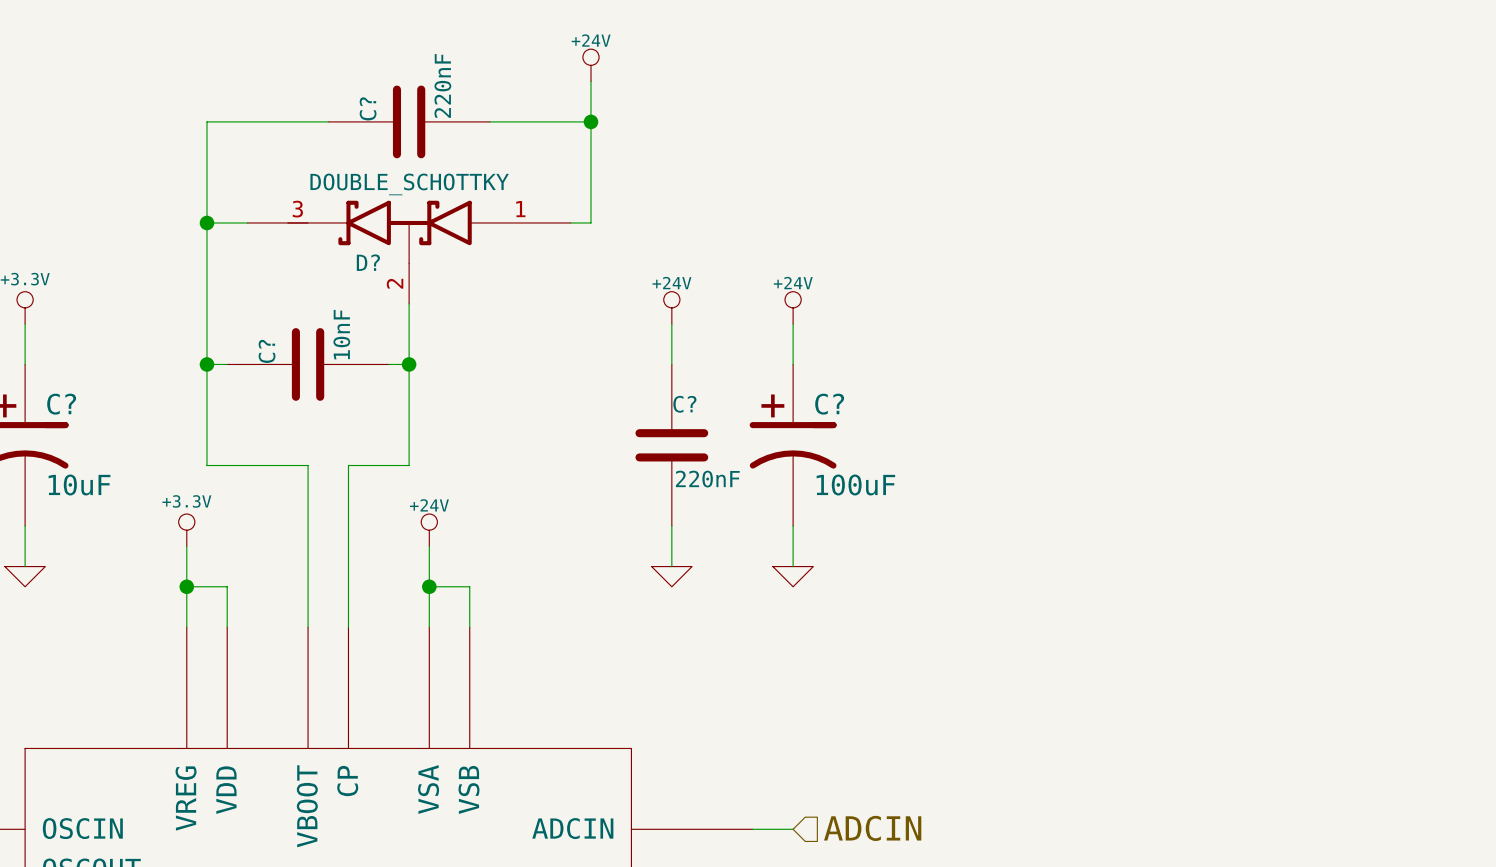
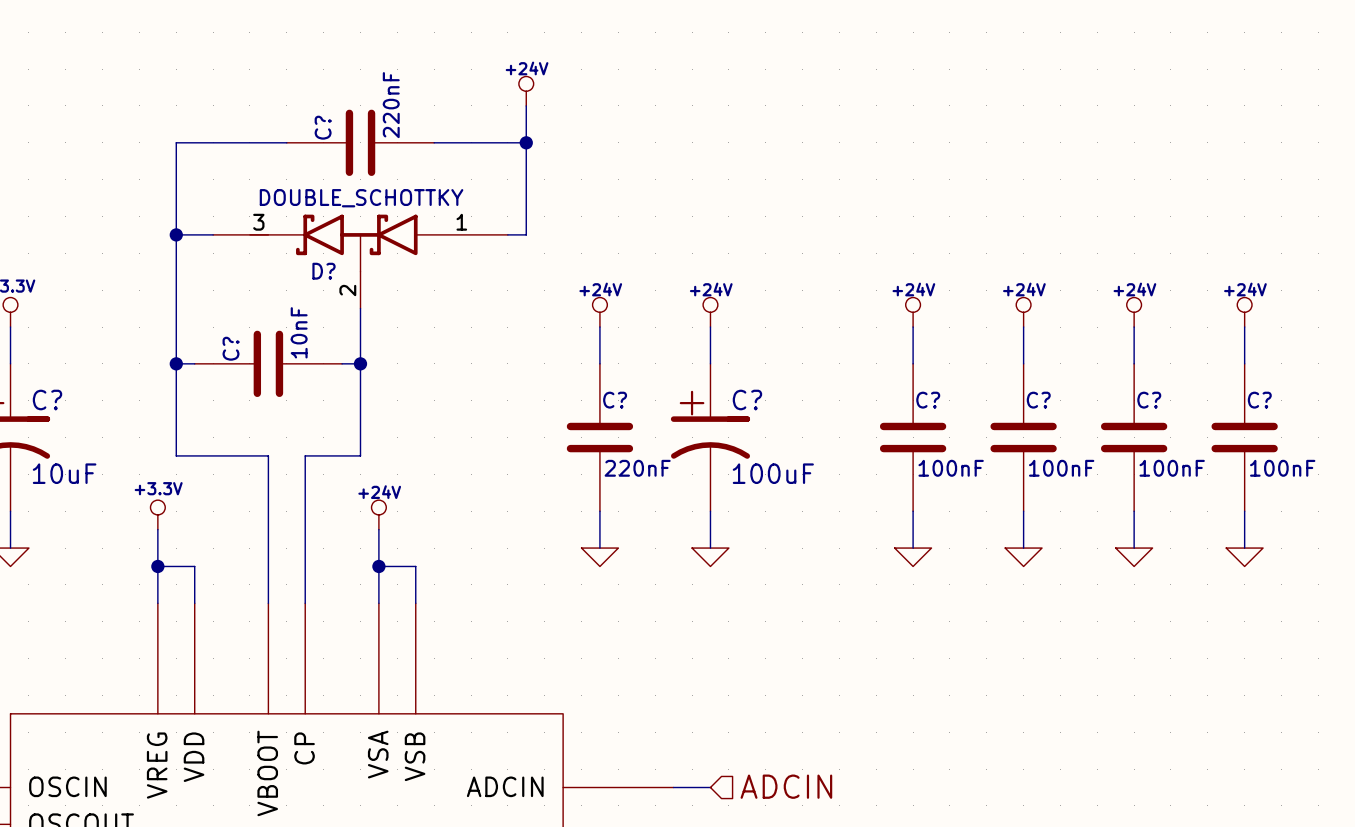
power symbol: none -> +24V (913, 312)
power symbol: none -> +24V (1023, 312)
power symbol: none -> +24V (1134, 312)
power symbol: none -> +24V (1244, 312)
wire: none -> (913, 327) (913, 363)
wire: none -> (1023, 327) (1023, 363)
wire: none -> (1134, 327) (1134, 363)
wire: none -> (1244, 327) (1244, 363)
C?: none -> 100nF (913, 437)
C?: none -> 100nF (1023, 437)
C?: none -> 100nF (1134, 437)
C?: none -> 100nF (1244, 437)
wire: none -> (913, 511) (913, 548)
wire: none -> (1023, 511) (1023, 548)
wire: none -> (1134, 511) (1134, 548)
wire: none -> (1244, 511) (1244, 548)
power symbol: none -> (913, 557)
power symbol: none -> (1023, 557)
power symbol: none -> (1134, 557)
power symbol: none -> (1244, 557)

